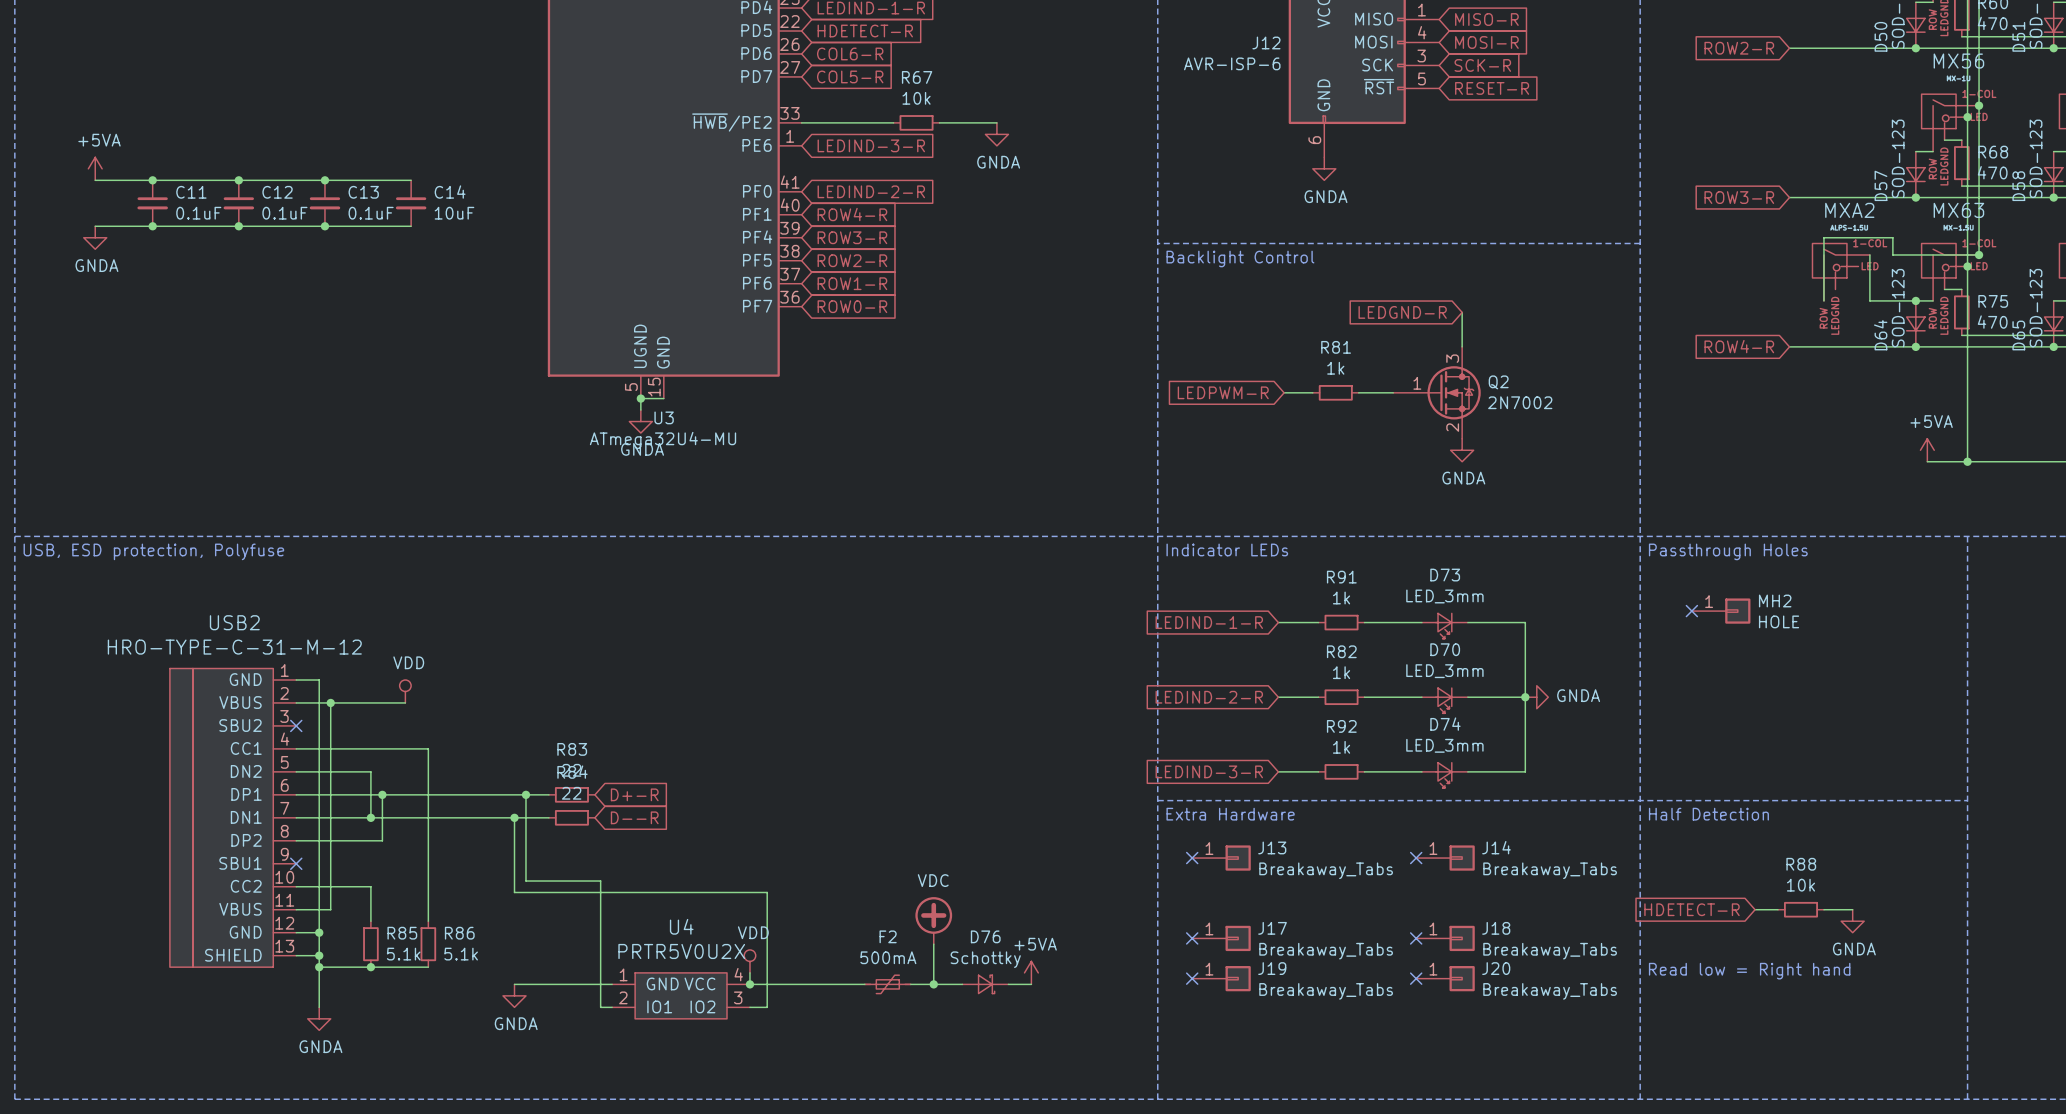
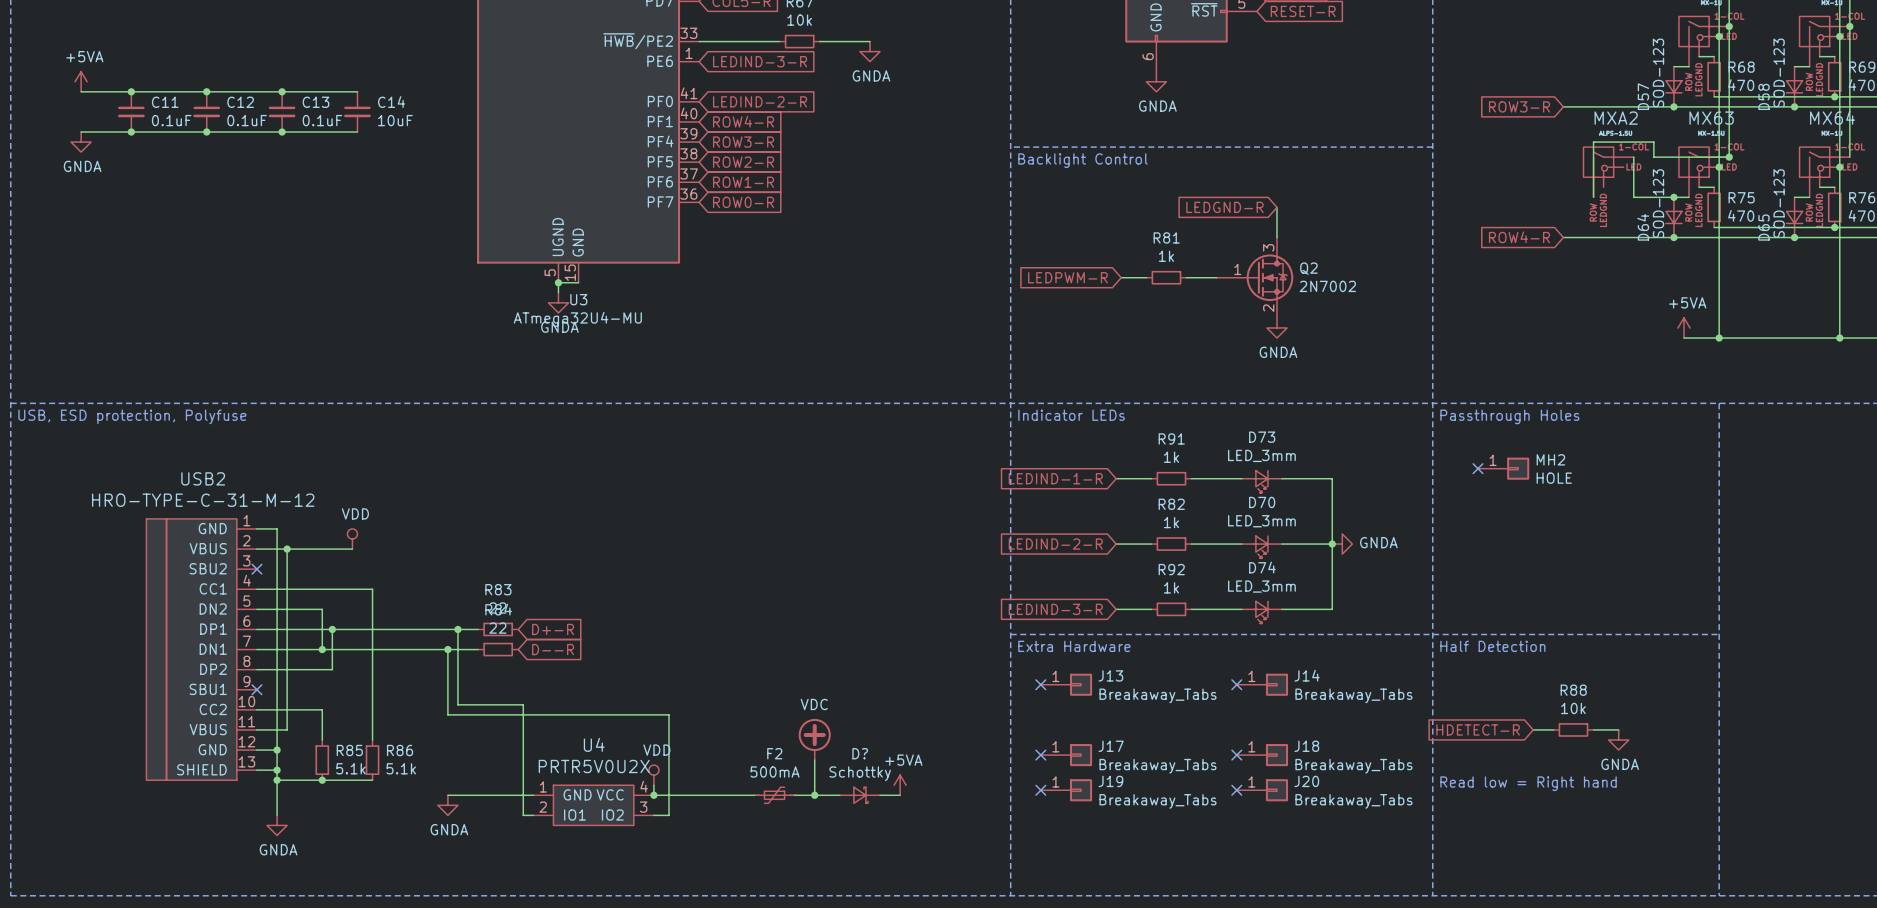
D76 name: D76 (985, 936) -> D? (860, 753)

